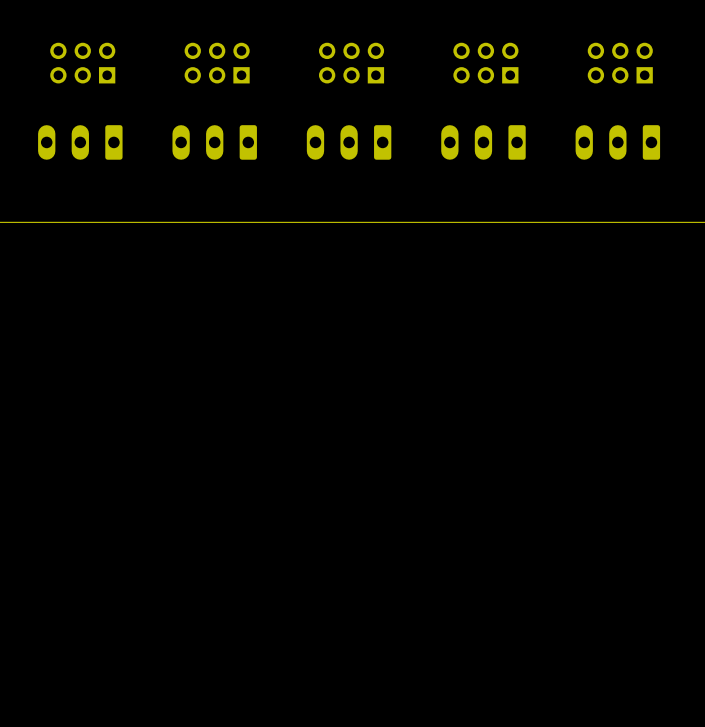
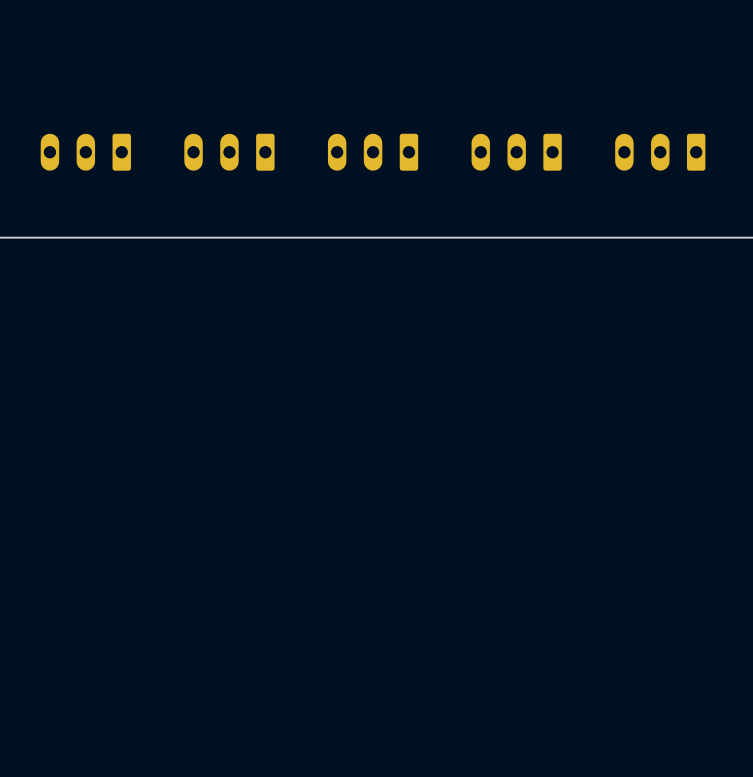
part: (82, 63) -> none
part: (217, 63) -> none
part: (351, 63) -> none
part: (485, 63) -> none
part: (620, 63) -> none

